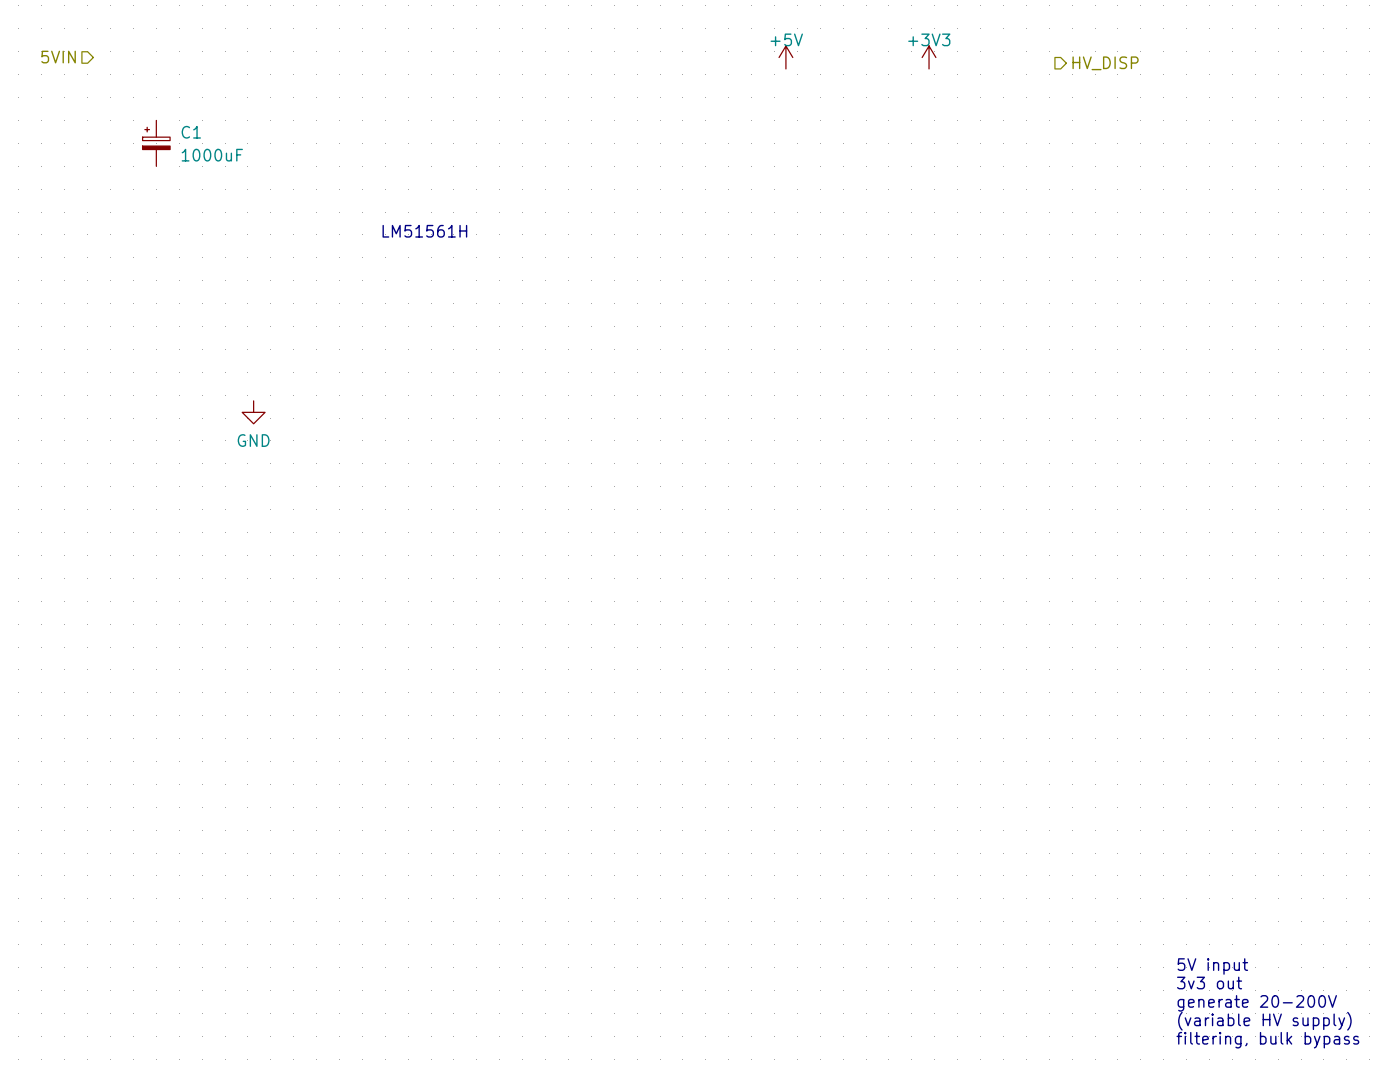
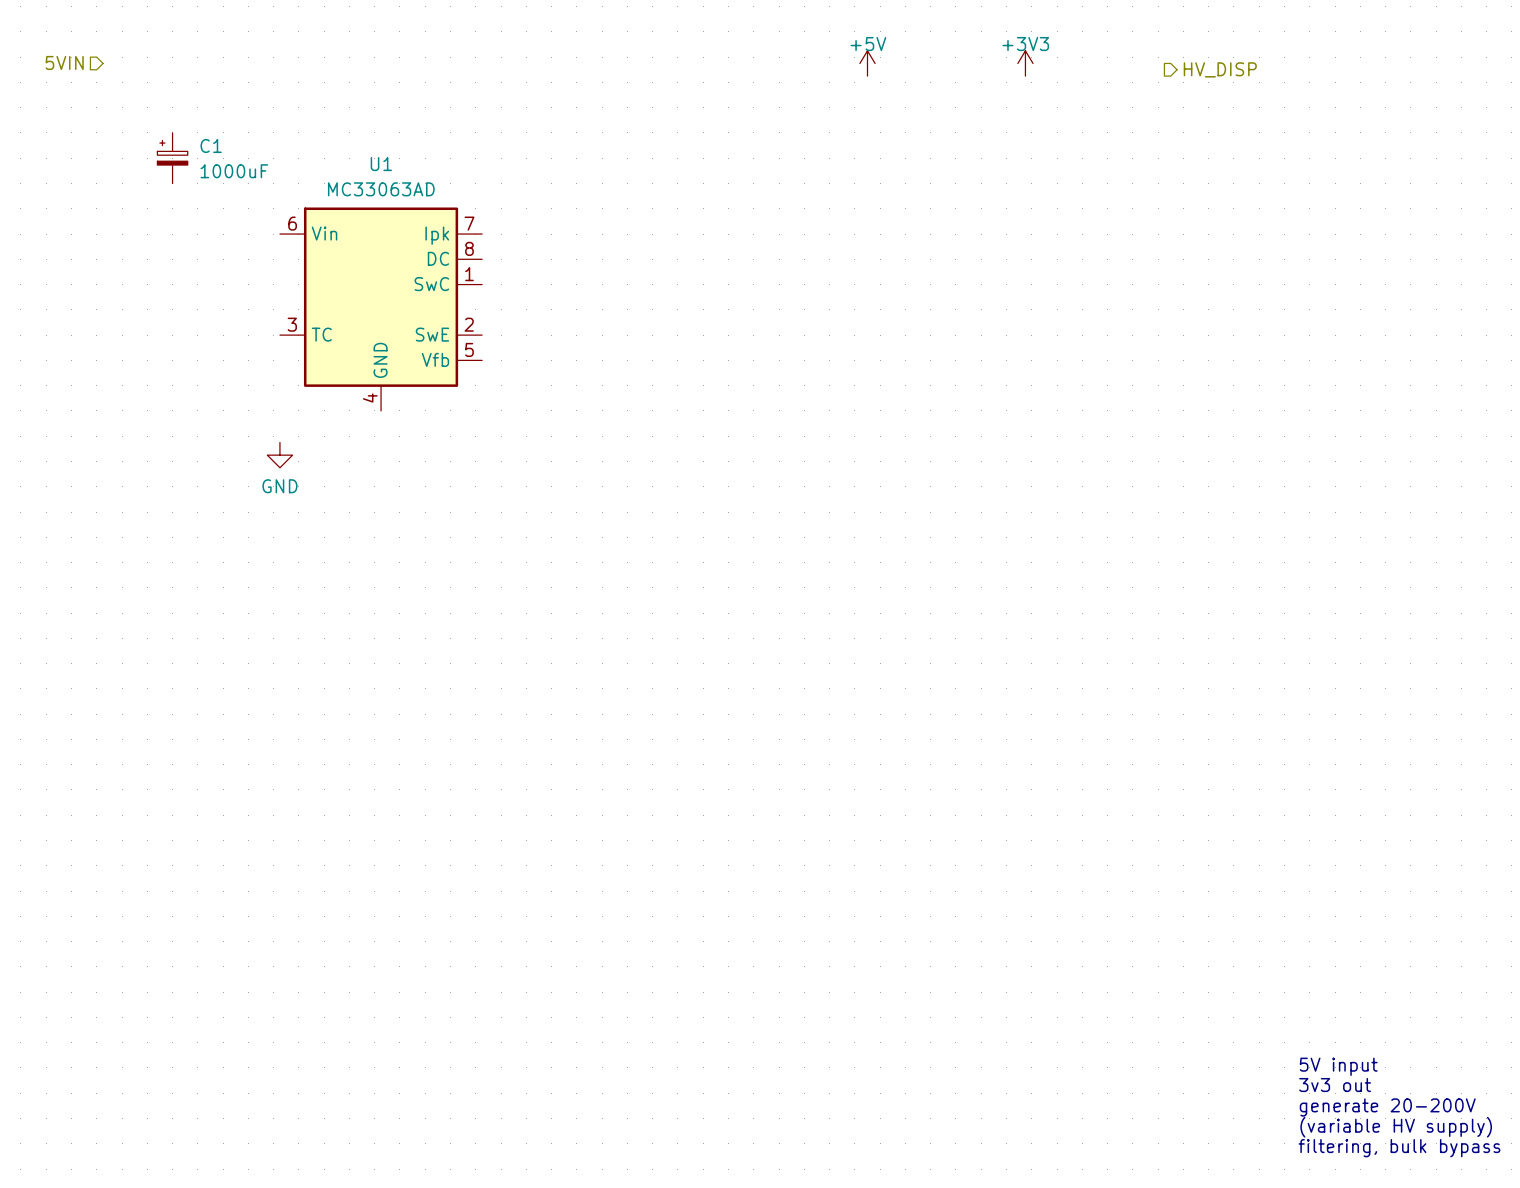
text: LM51561H (424, 231) -> none
U1: none -> MC33063AD (381, 309)

